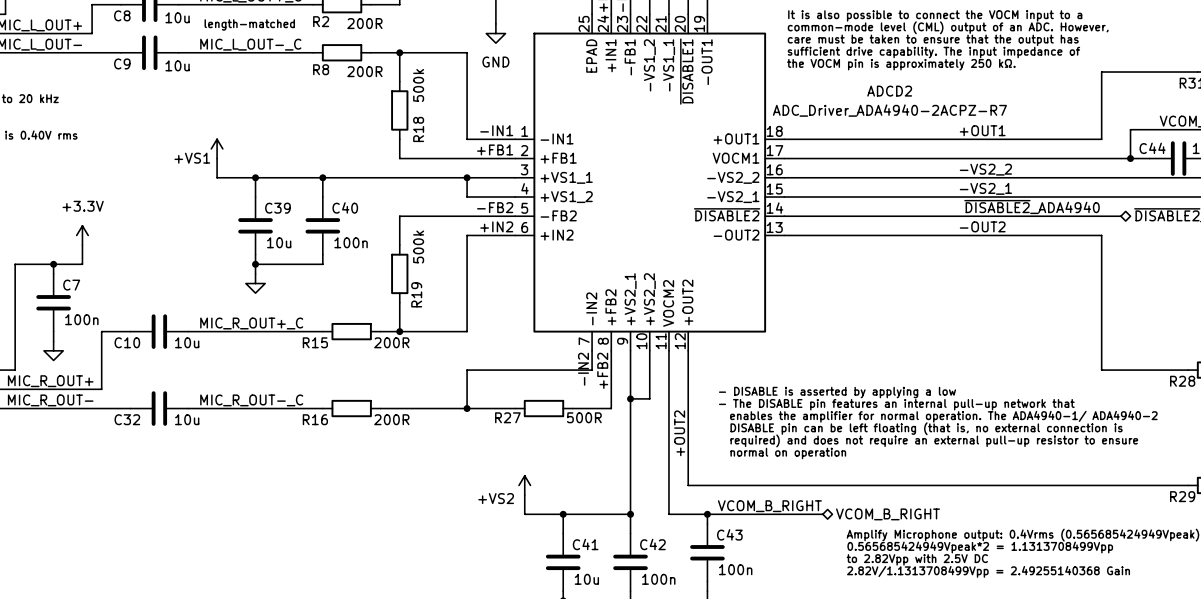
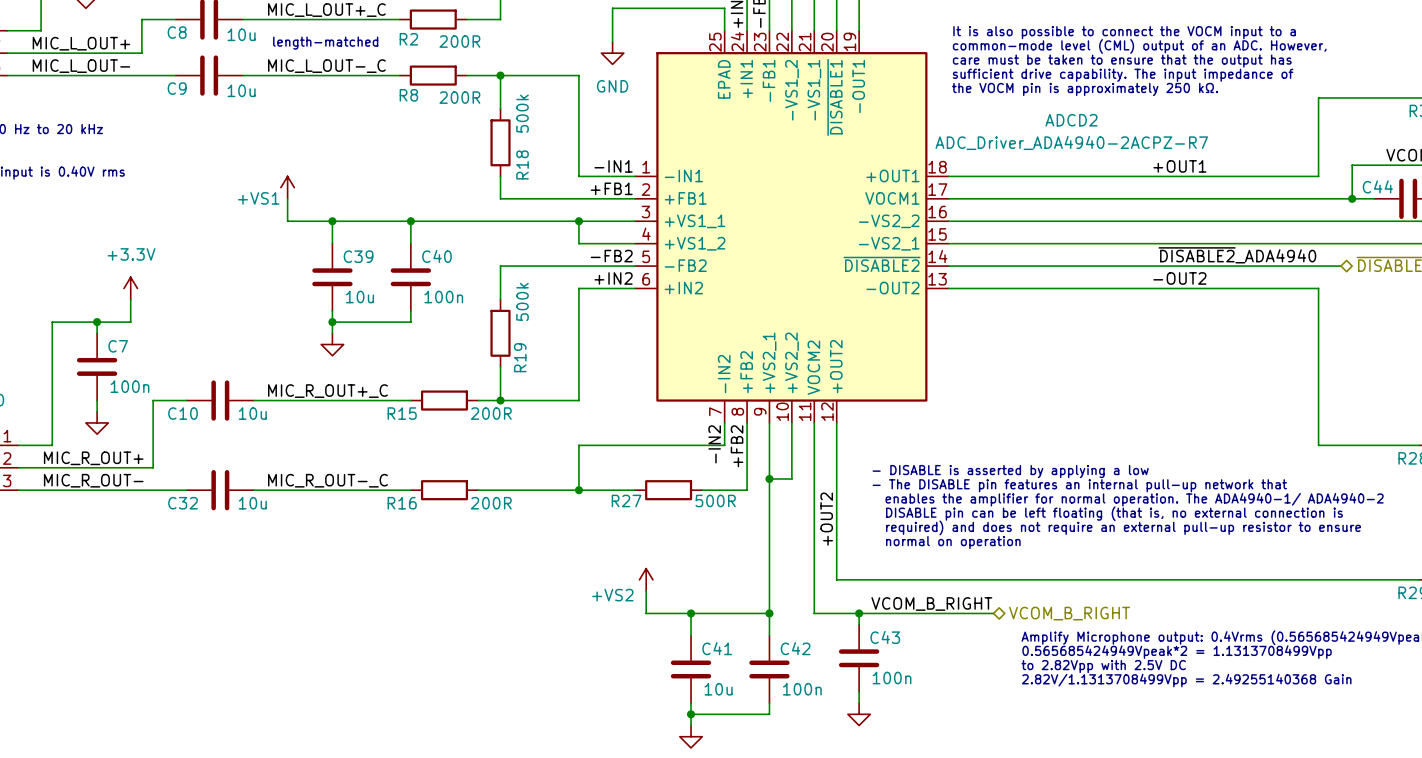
label: -VS2_2 (985, 169) -> none
label: -VS2_1 (985, 188) -> none

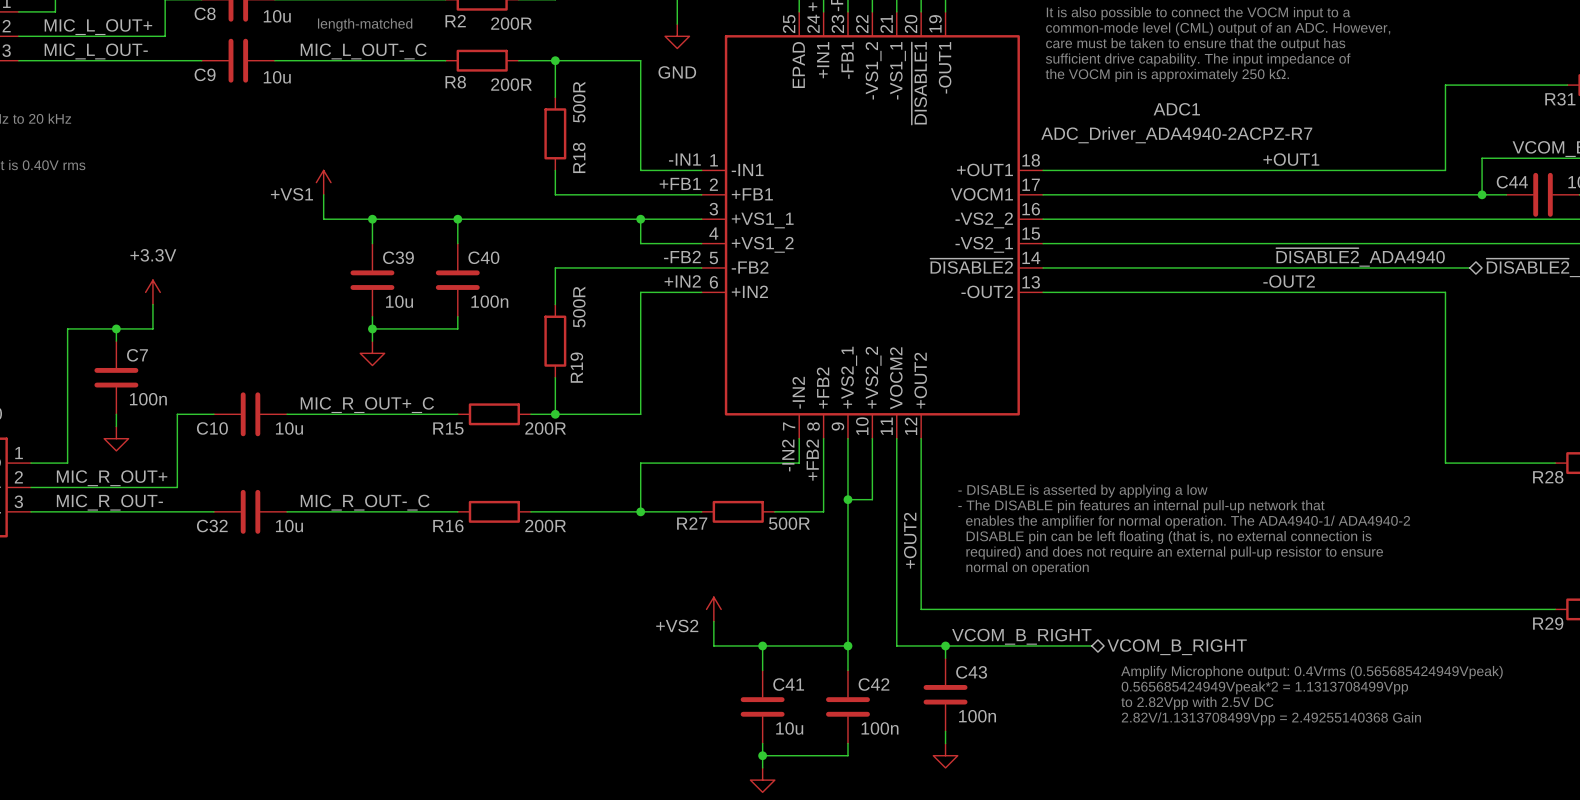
R18 value: 500k (522, 113) -> 500R (579, 102)
ADCD2 name: ADCD2 (1071, 120) -> ADC1 (1176, 109)
R19 value: 500k (522, 301) -> 500R (579, 307)

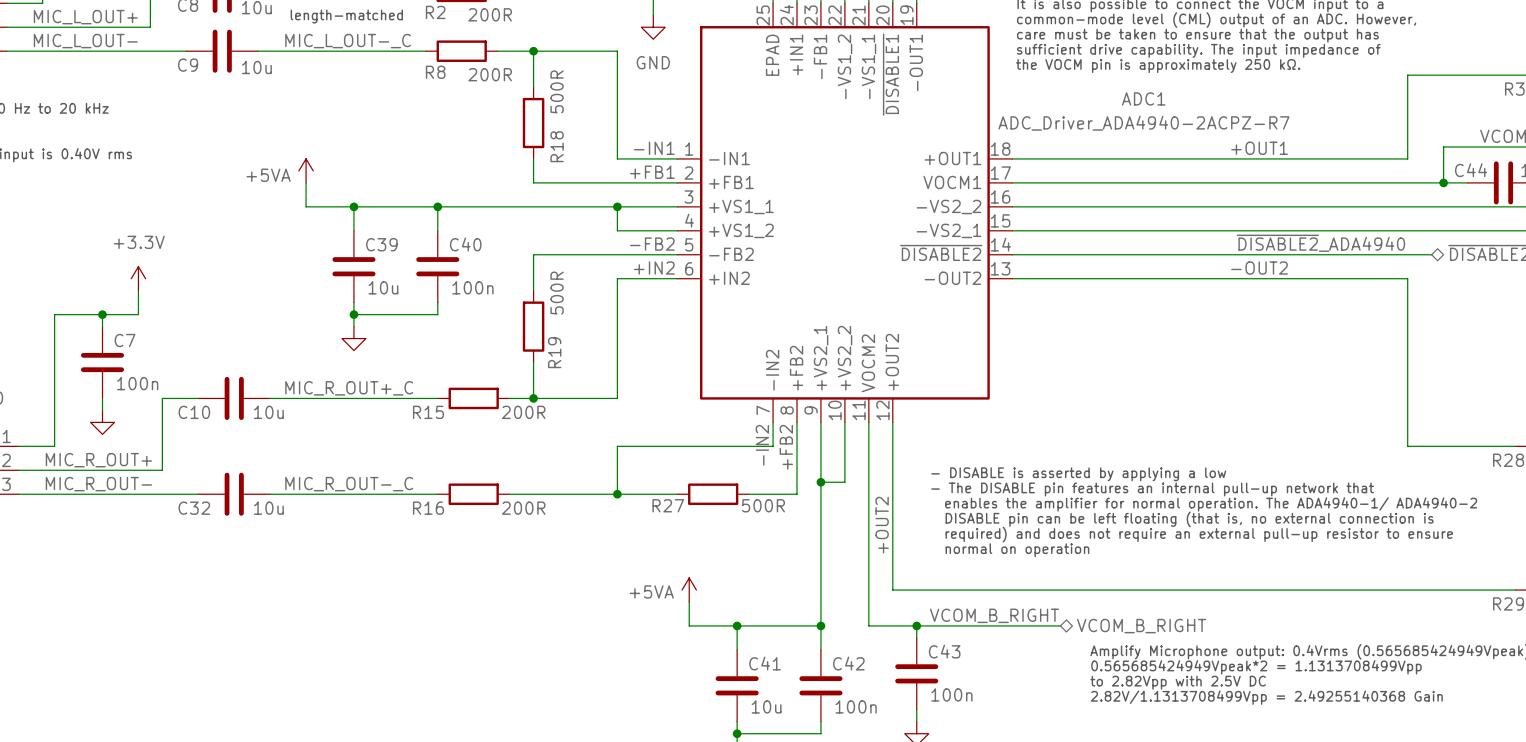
power symbol: +VS1 (323, 182) -> +5VA (306, 170)
power symbol: +VS2 (713, 609) -> +5VA (689, 590)

